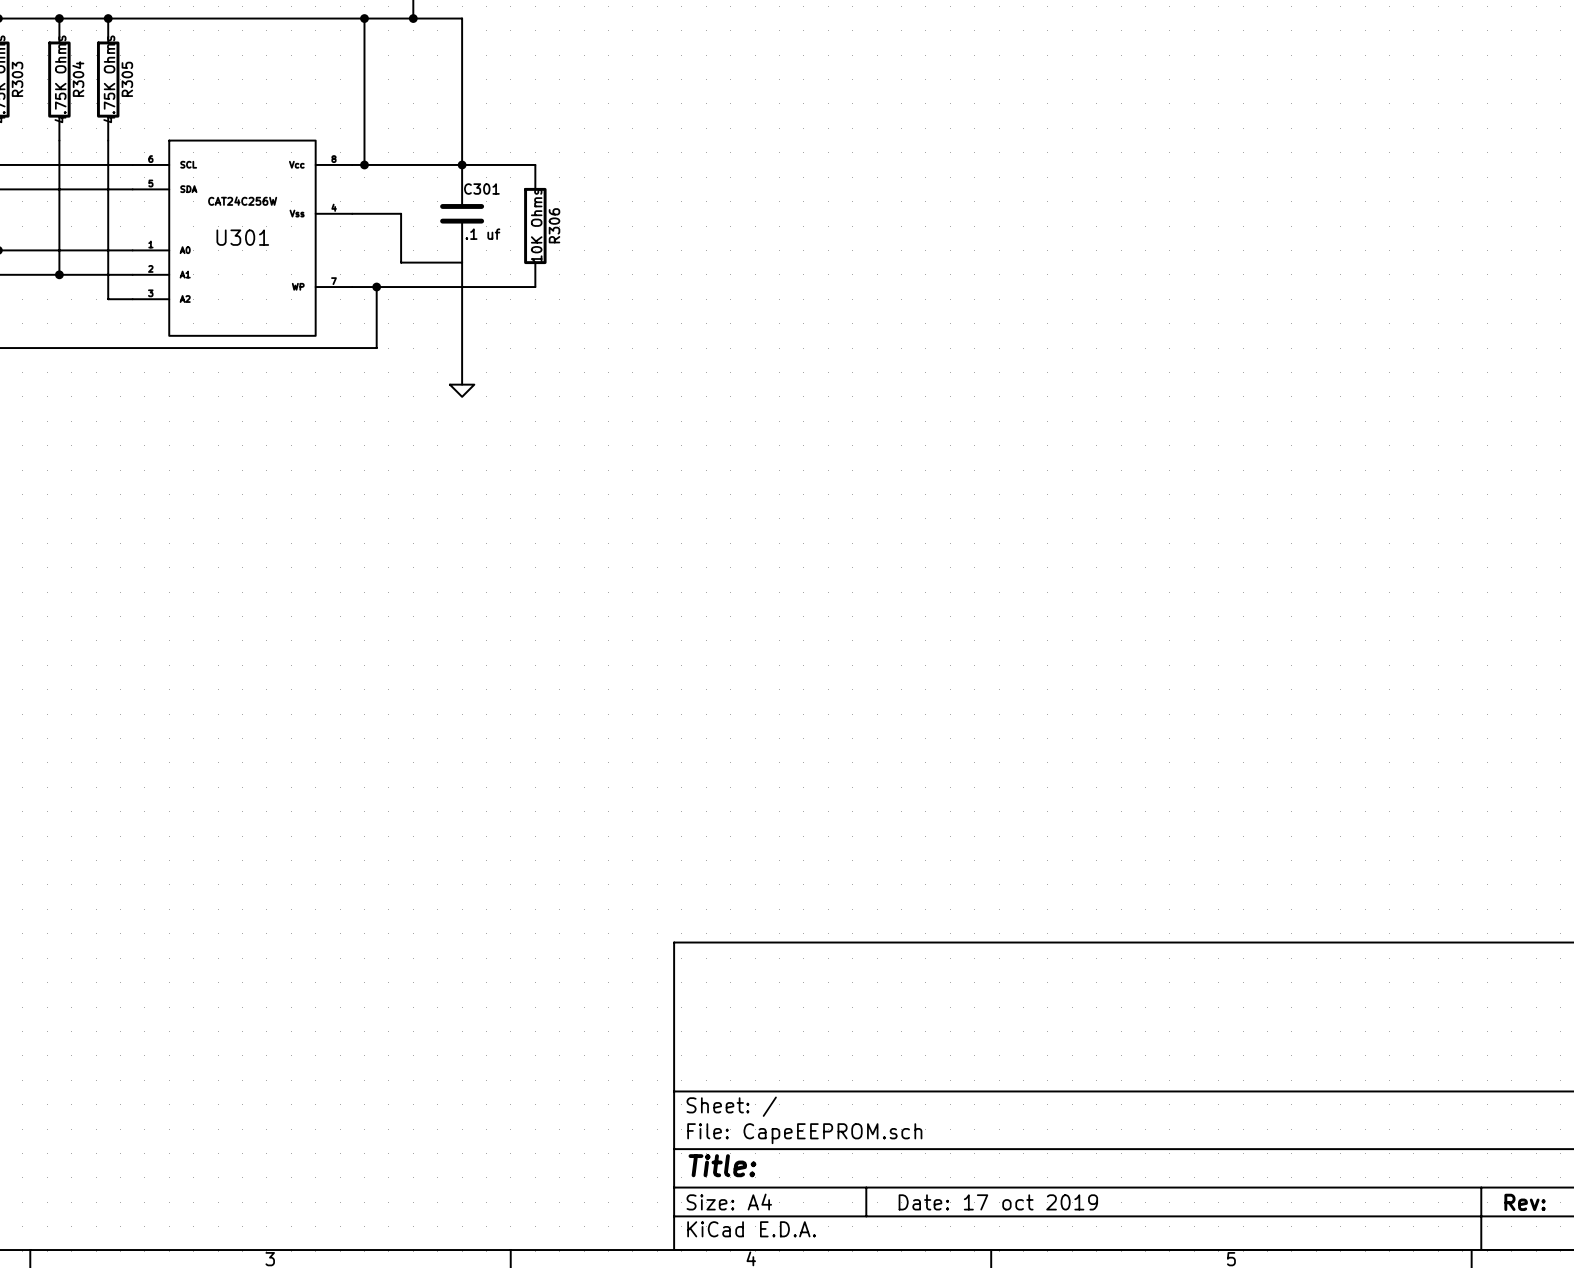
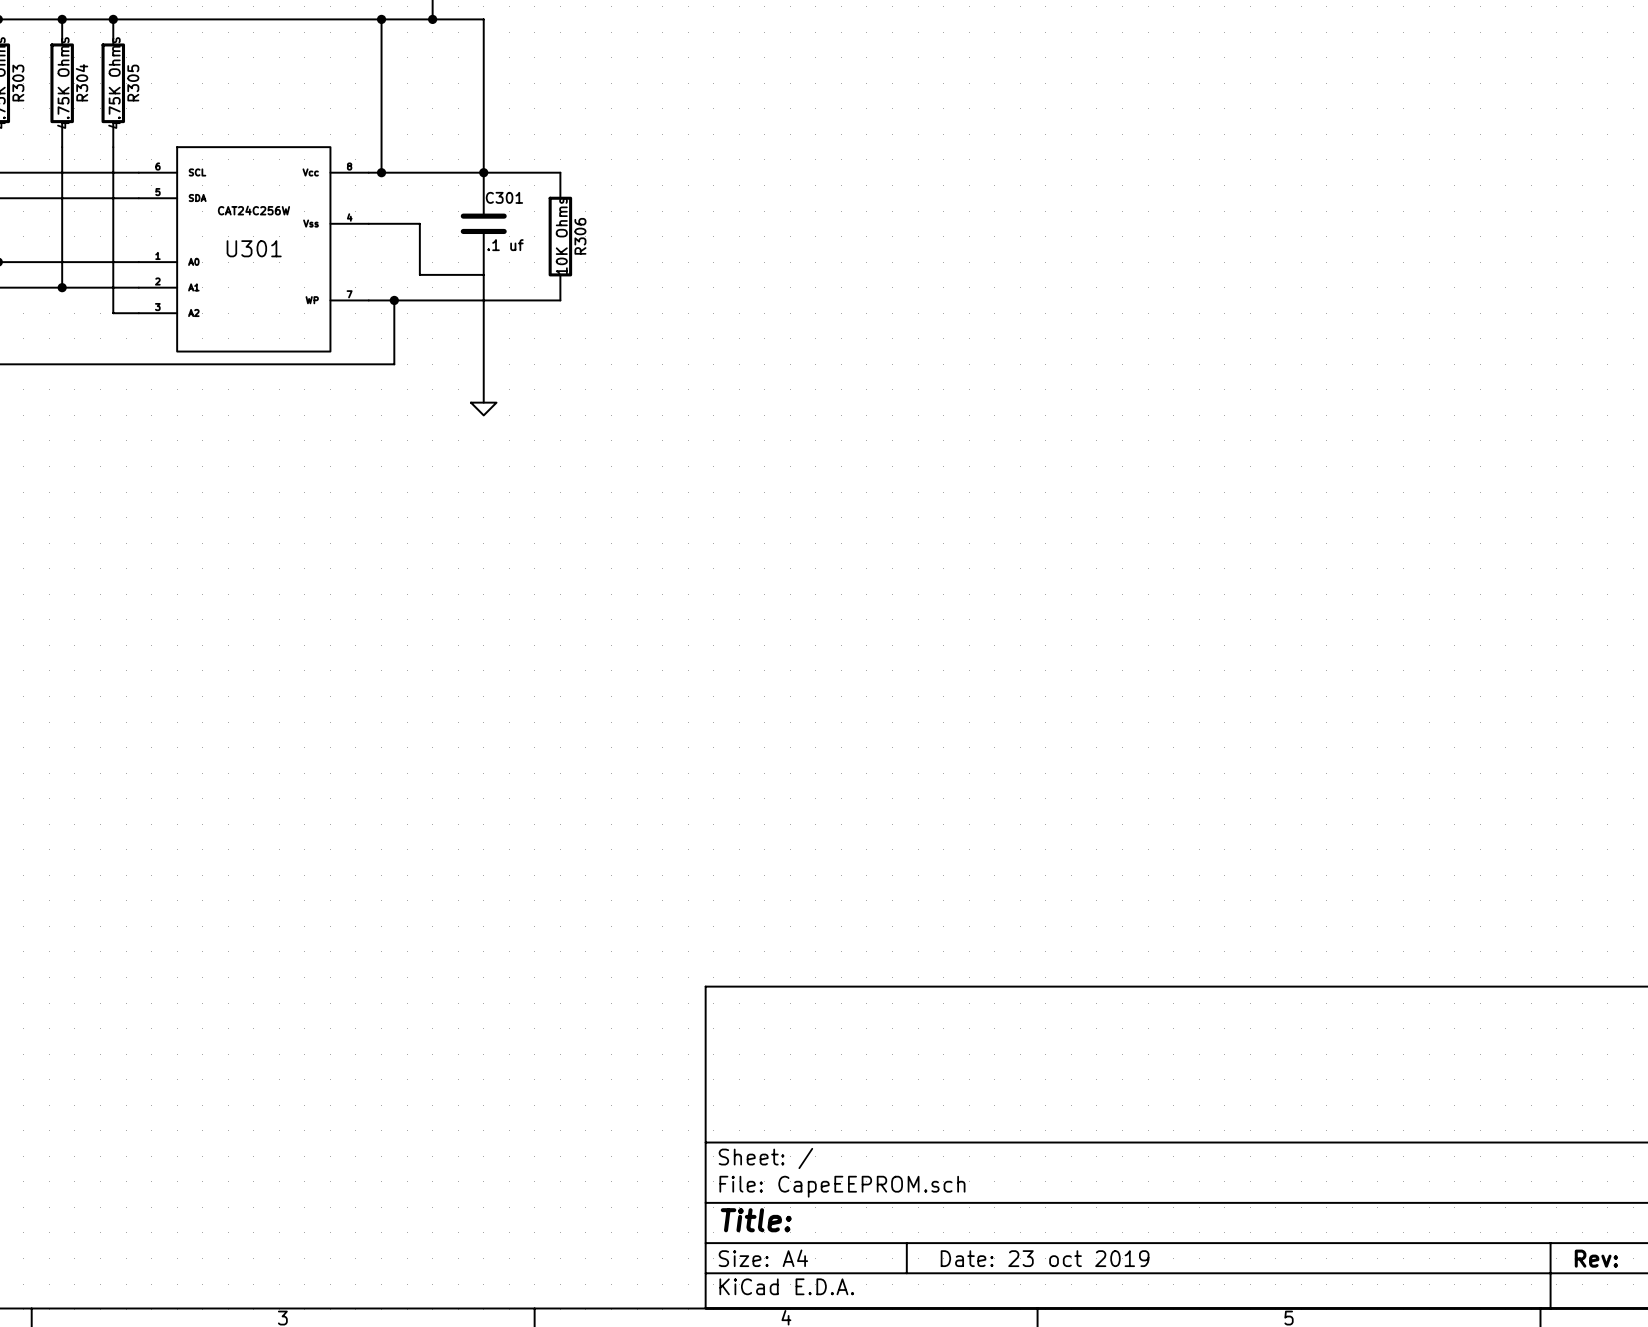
title block: Date: 17 oct 2019 (998, 1202) -> Date: 23 oct 2019 (1045, 1258)

